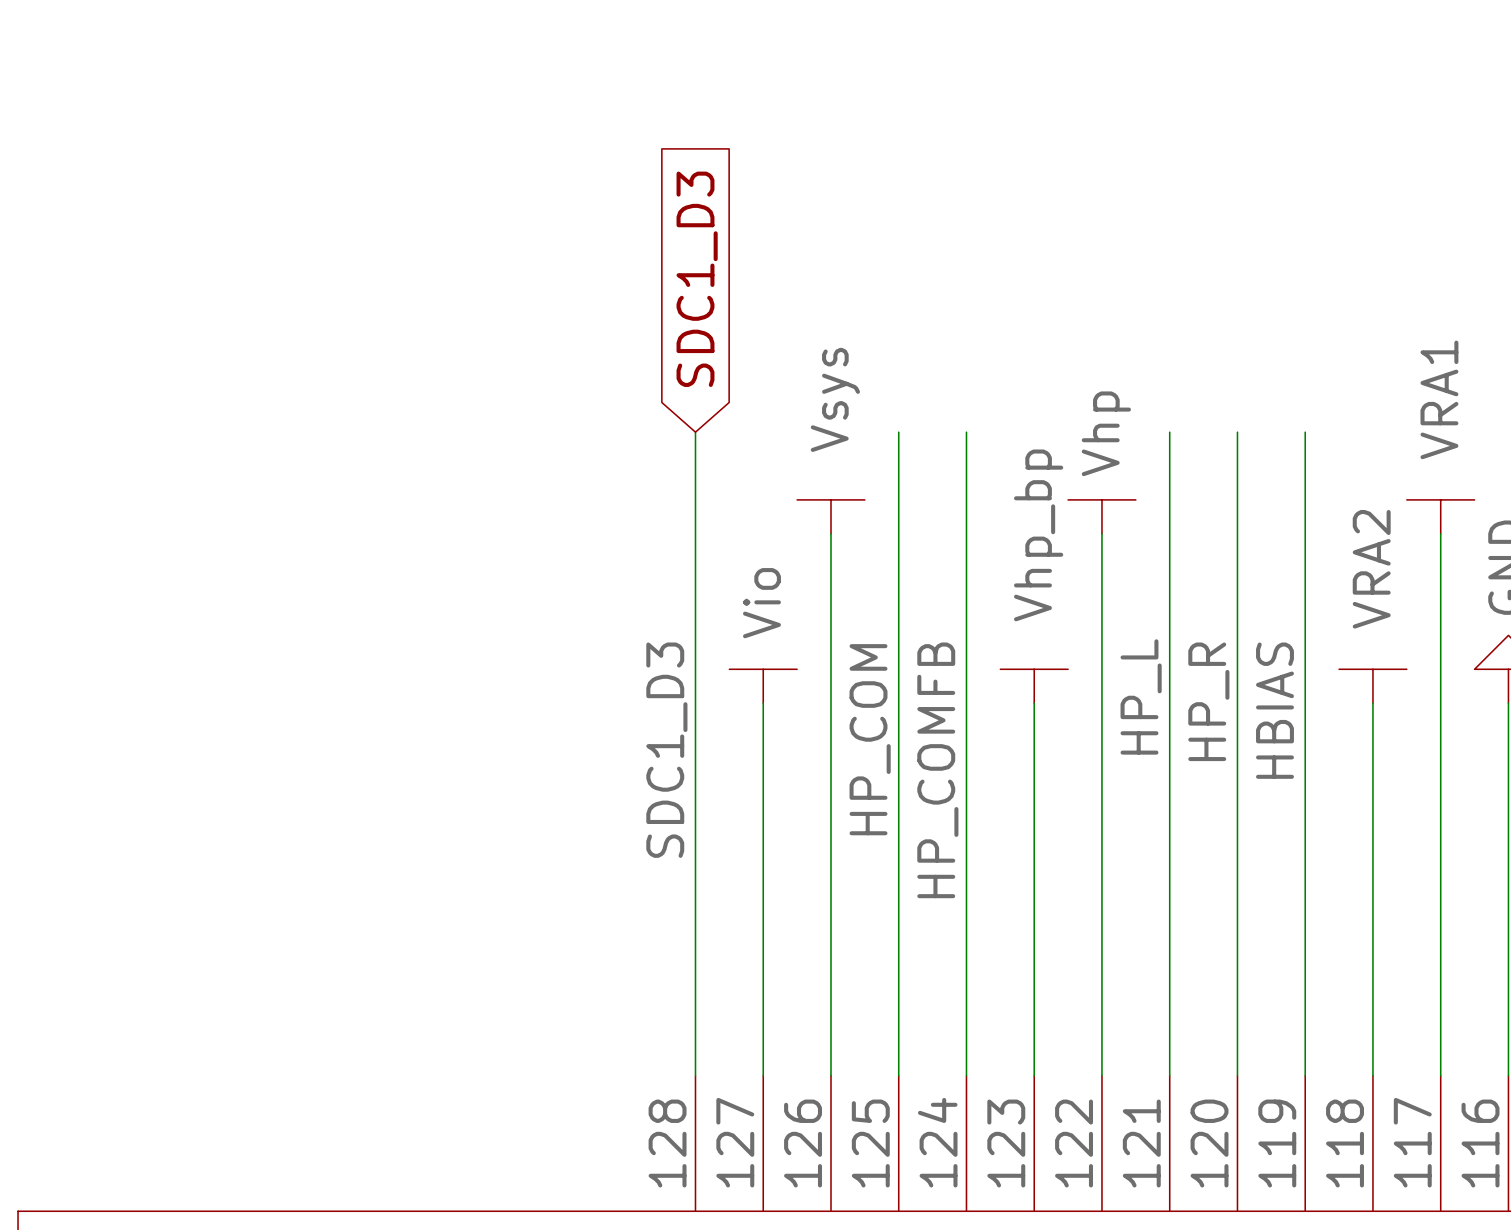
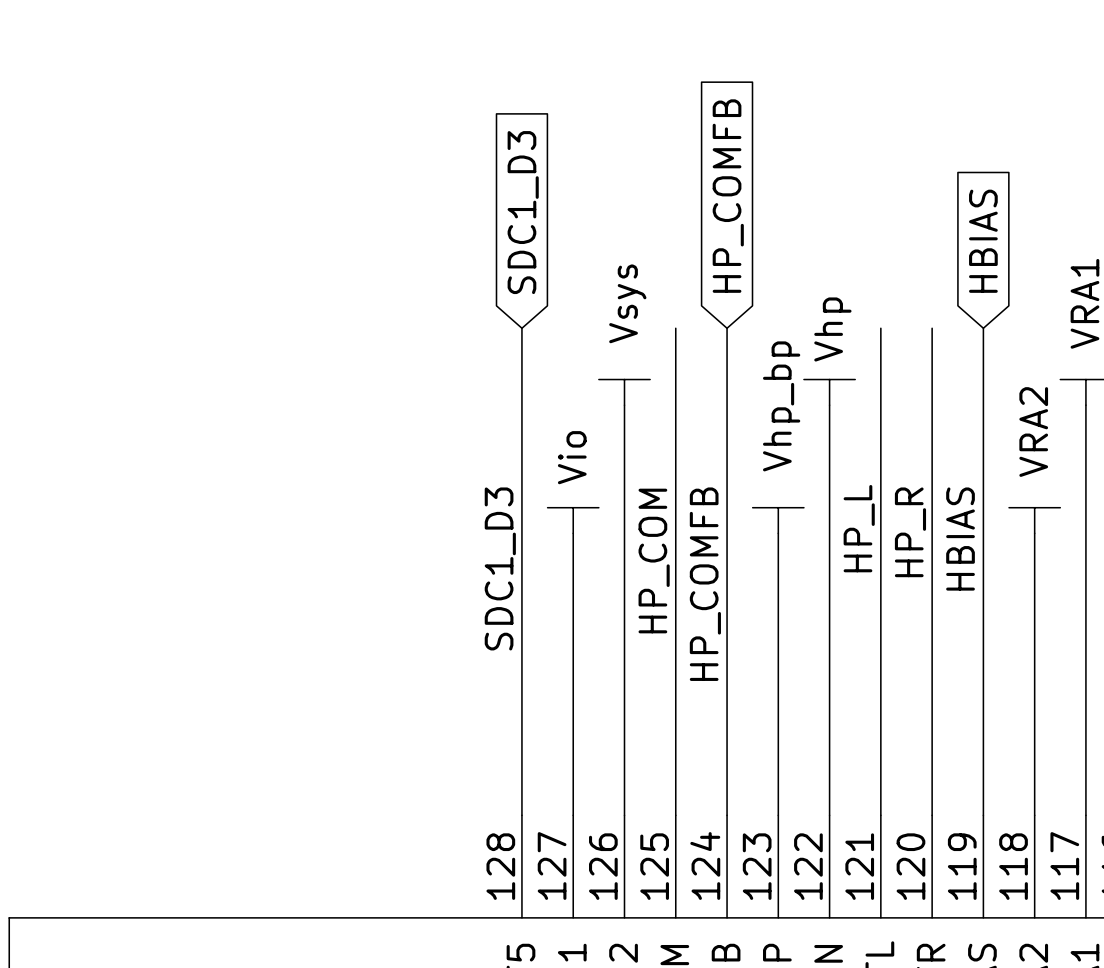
global label: none -> HP_COMFB (728, 196)
global label: none -> HBIAS (983, 241)

